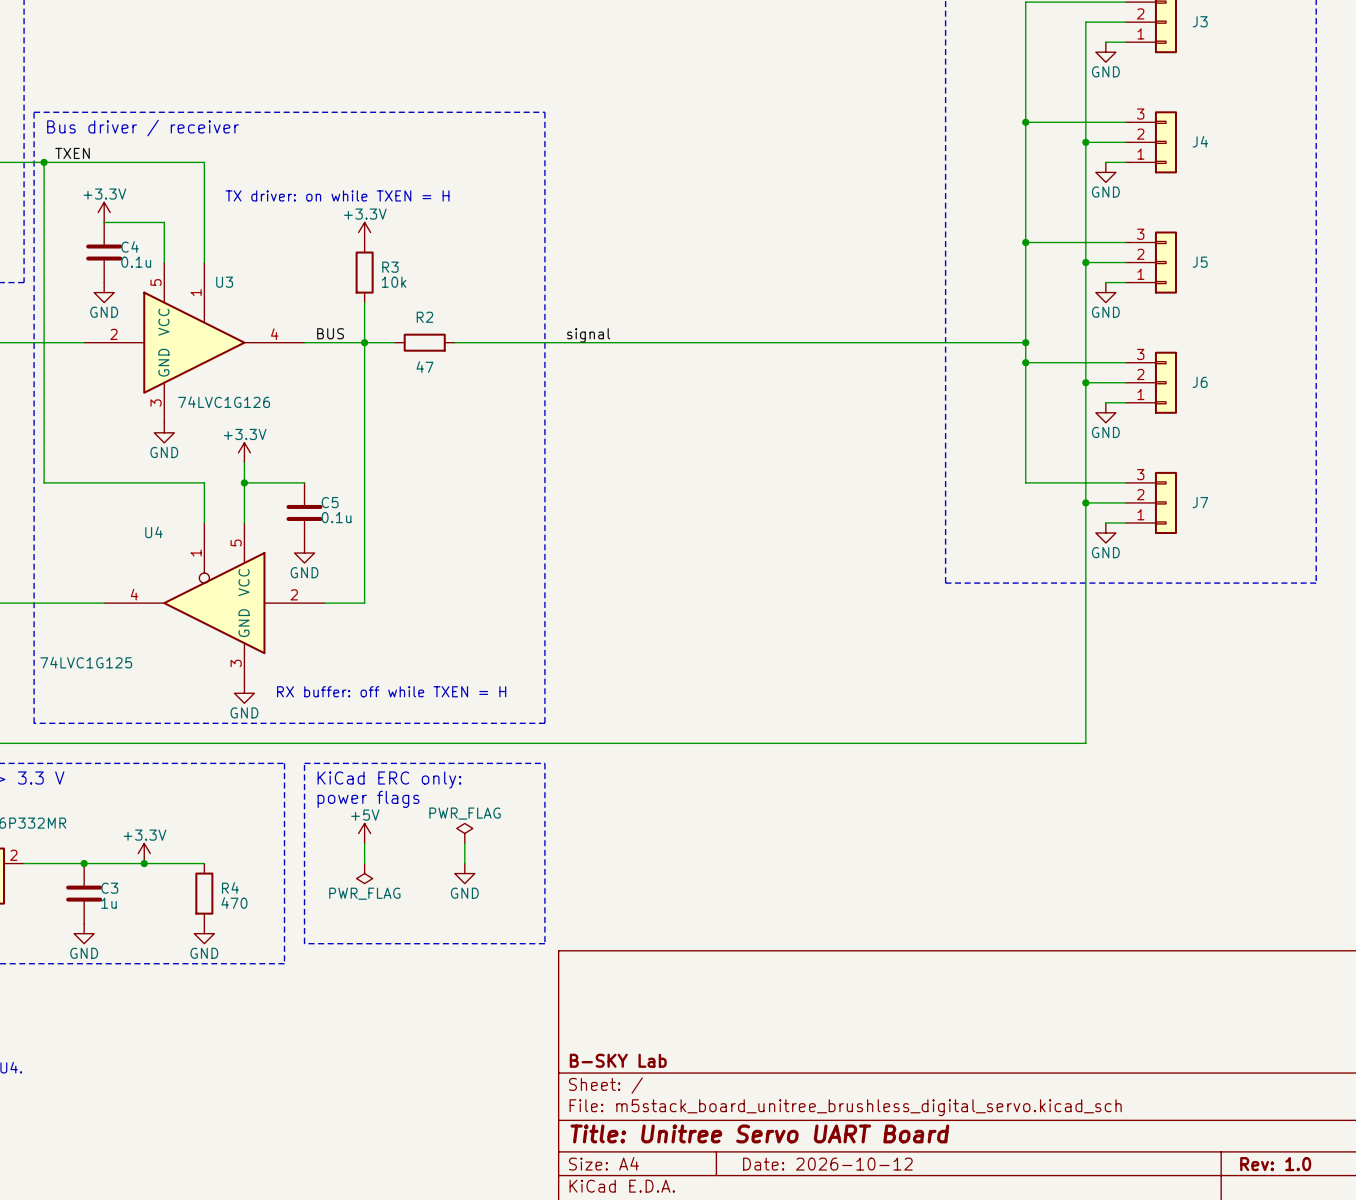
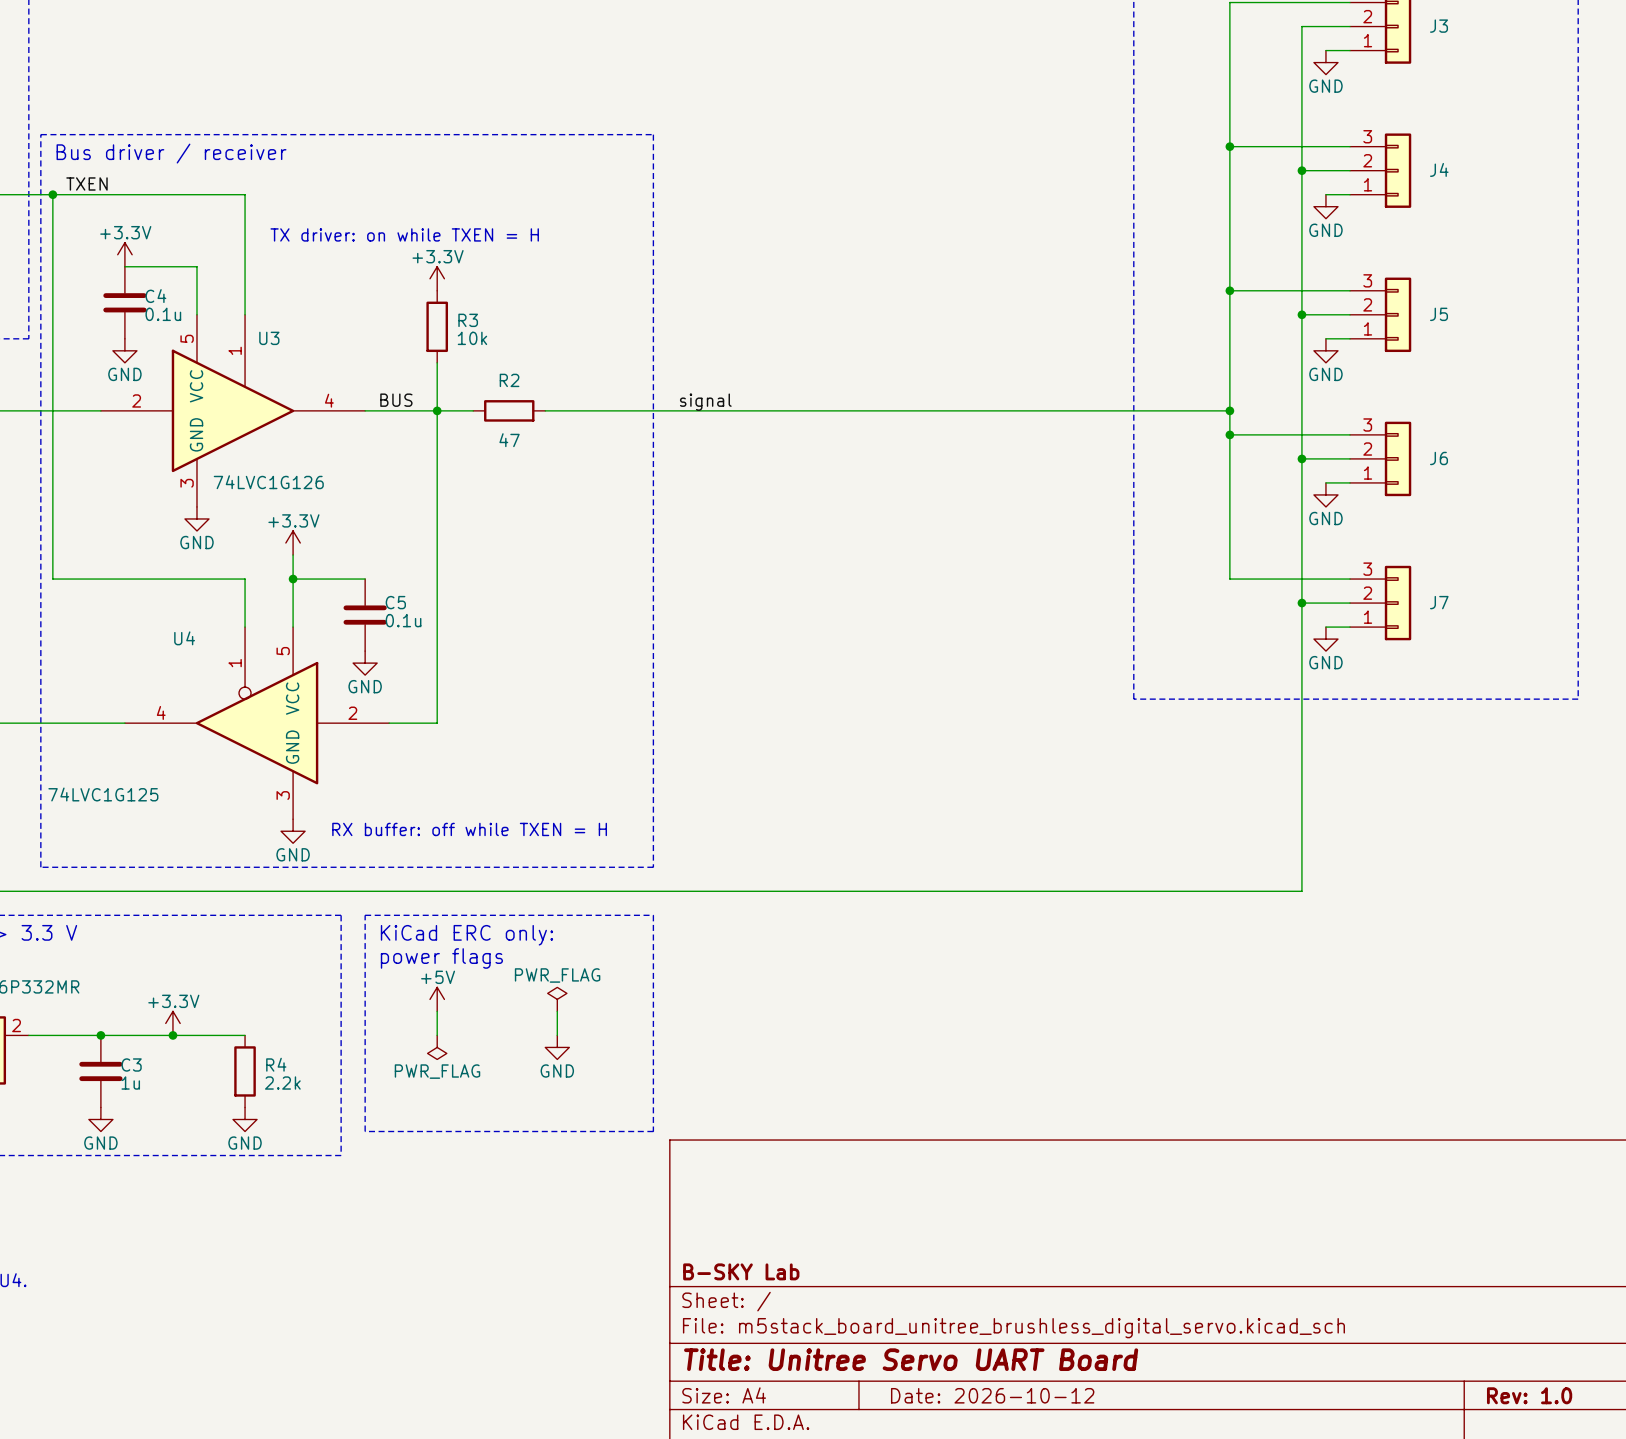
R4 value: 470 (234, 903) -> 2.2k (282, 1083)

